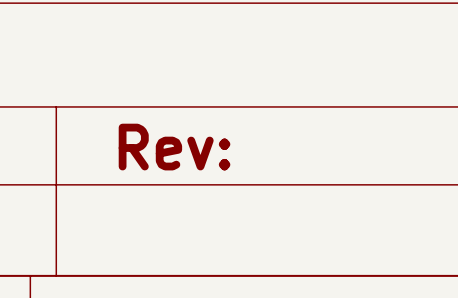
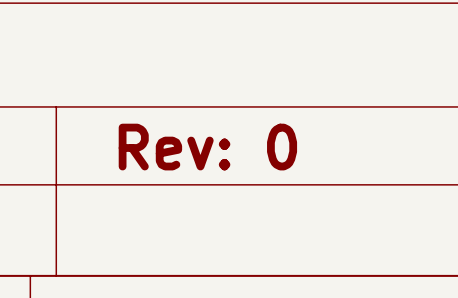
title block: Rev: (174, 147) -> Rev: 0 (207, 147)

